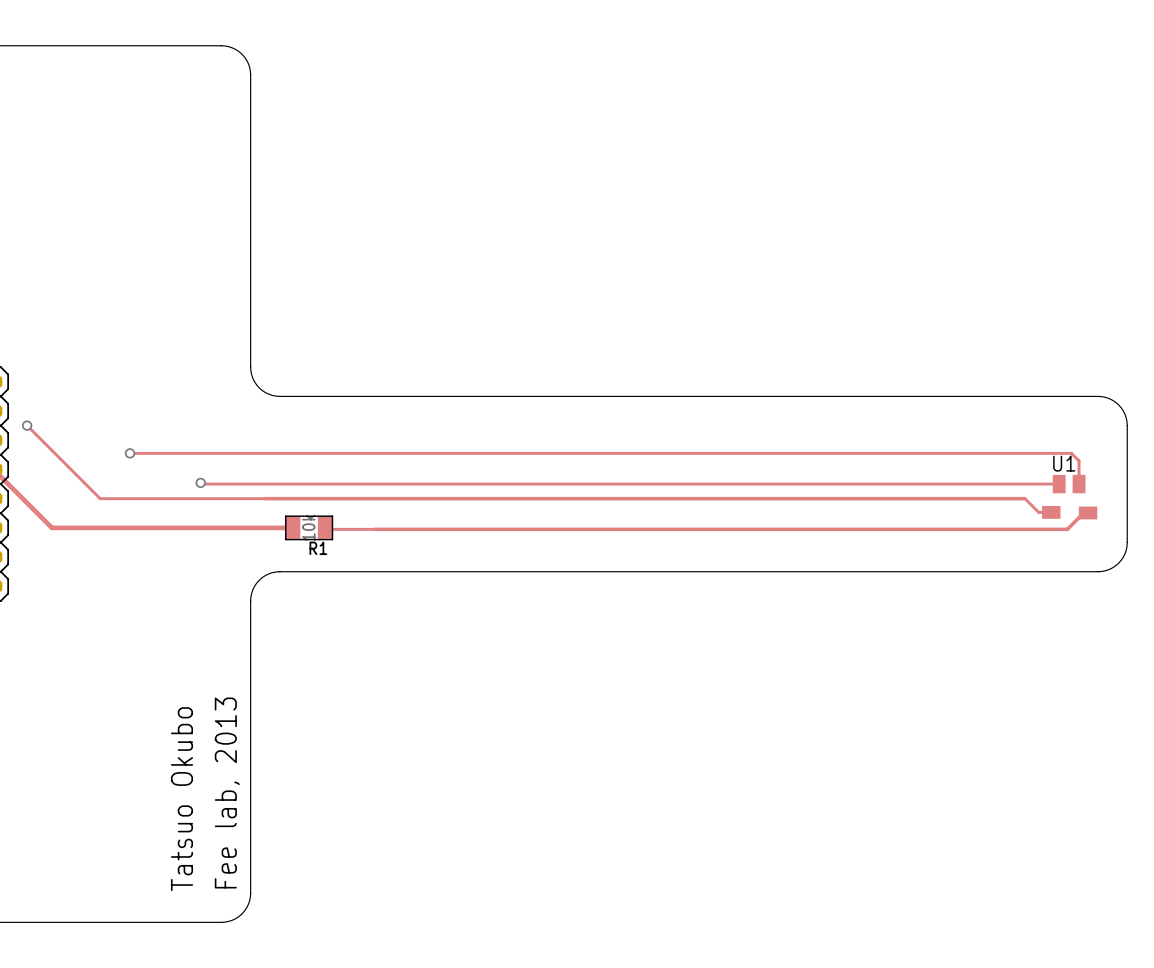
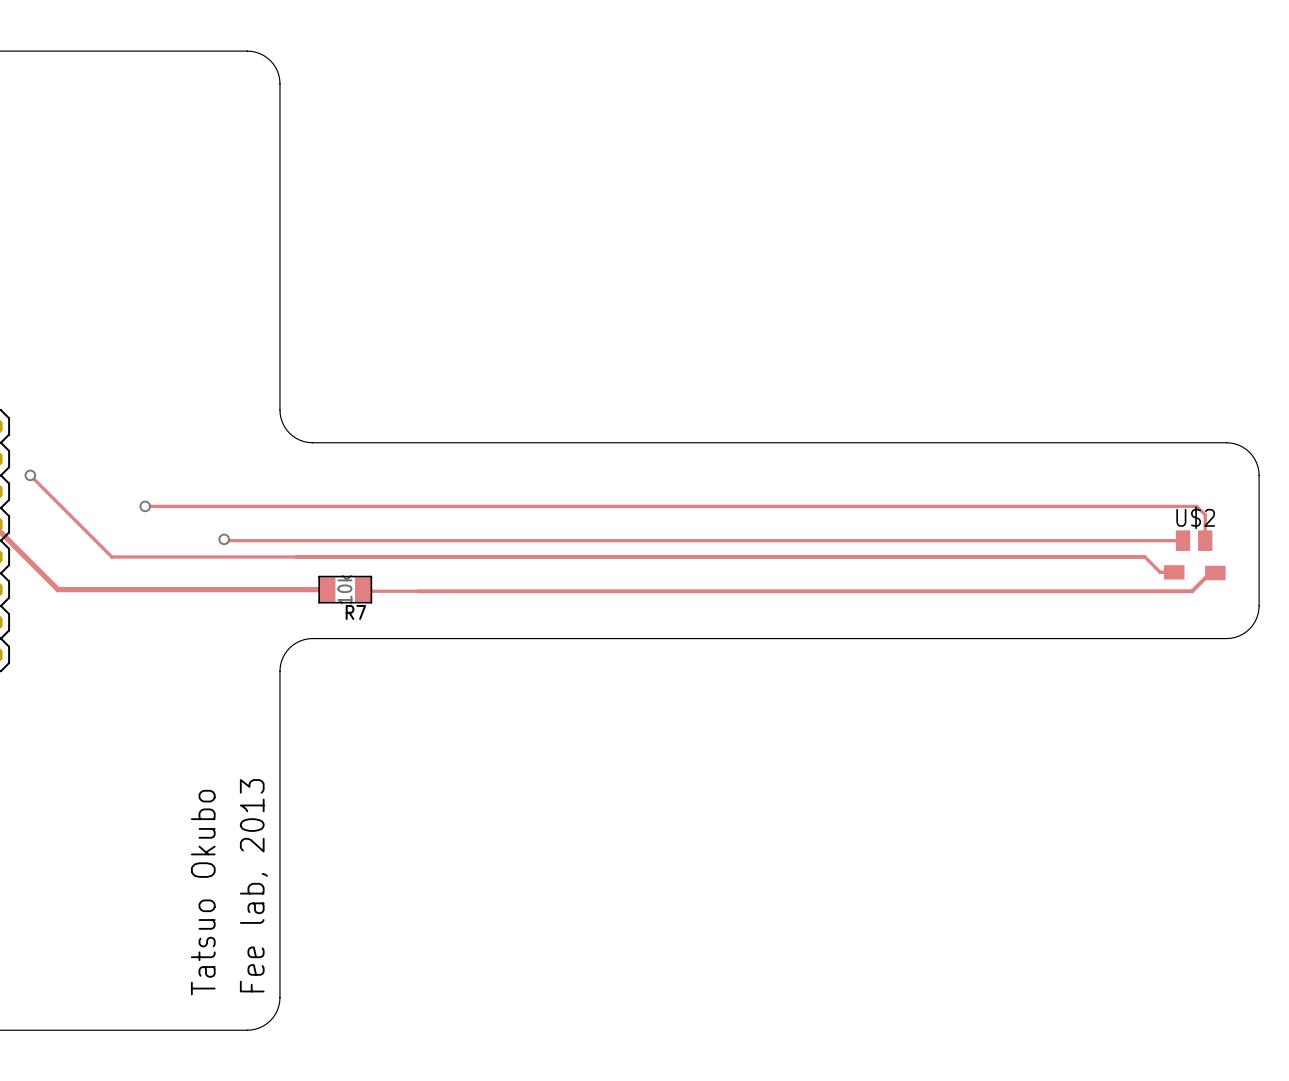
U1 name: U1 (1064, 463) -> U$2 (1195, 517)
R1 name: R1 (318, 548) -> R7 (355, 612)

